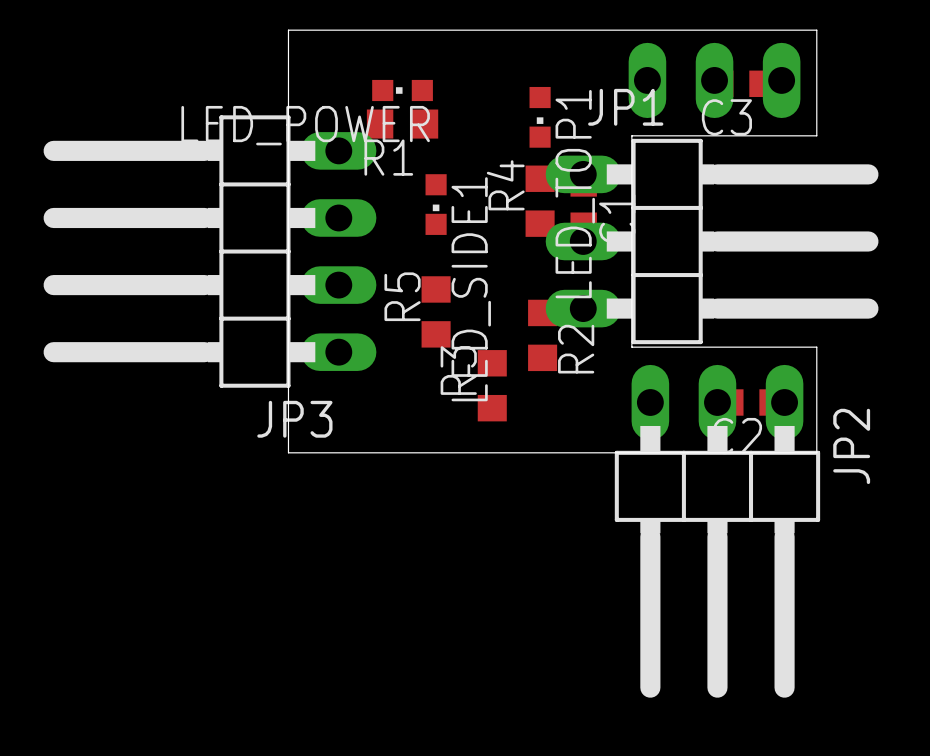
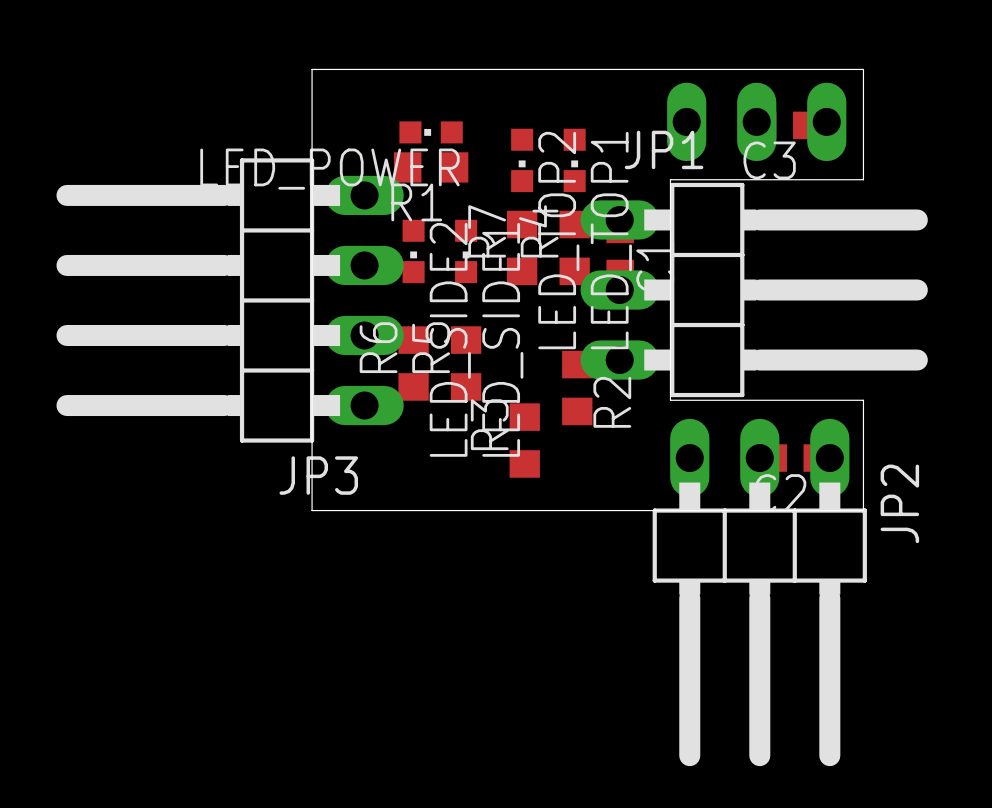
LED_TOP2: none -> (522, 160)
R7: none -> (522, 247)
LED_SIDE2: none -> (413, 251)
R6: none -> (413, 363)

